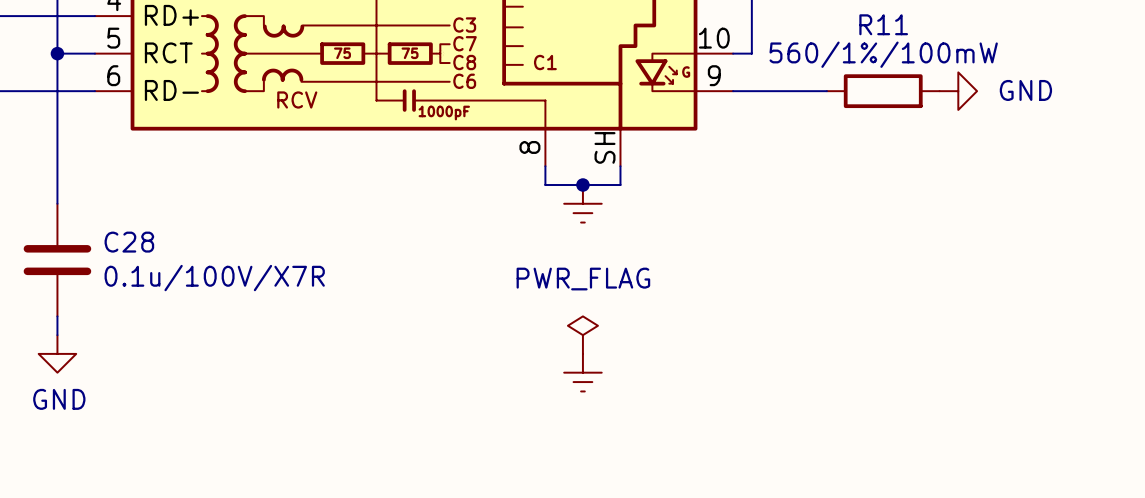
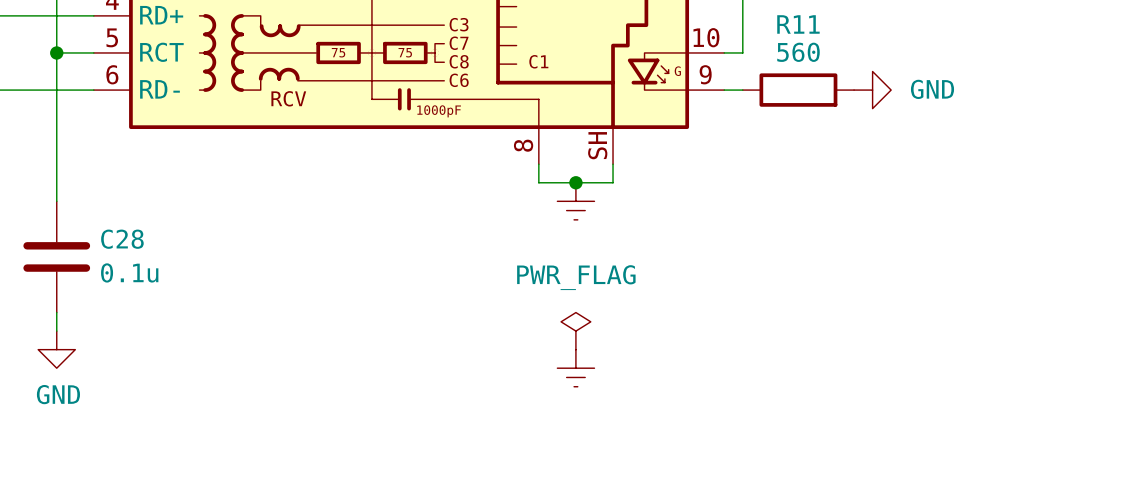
R11 value: 560/1%/100mW (883, 54) -> 560 (798, 52)
wire: (751, 91) (826, 91) -> none
R11 position: (883, 91) -> (798, 90)
power symbol position: GND (958, 91) -> GND (872, 90)
C28 value: 0.1u/100V/X7R (214, 278) -> 0.1u (129, 272)

